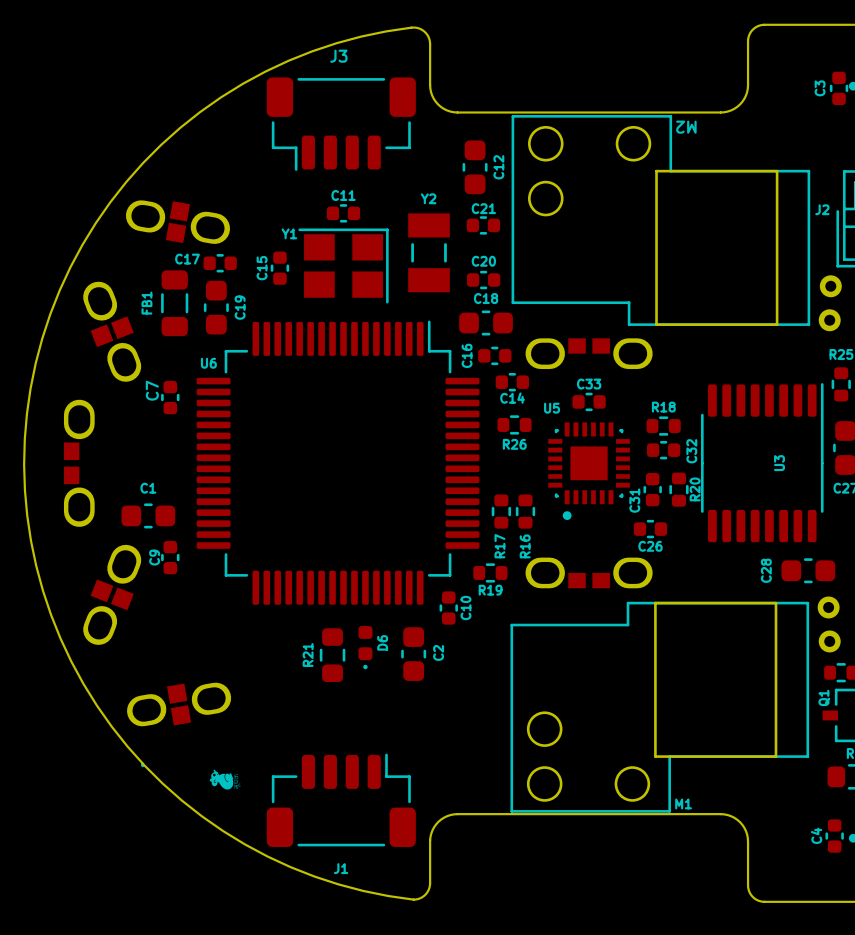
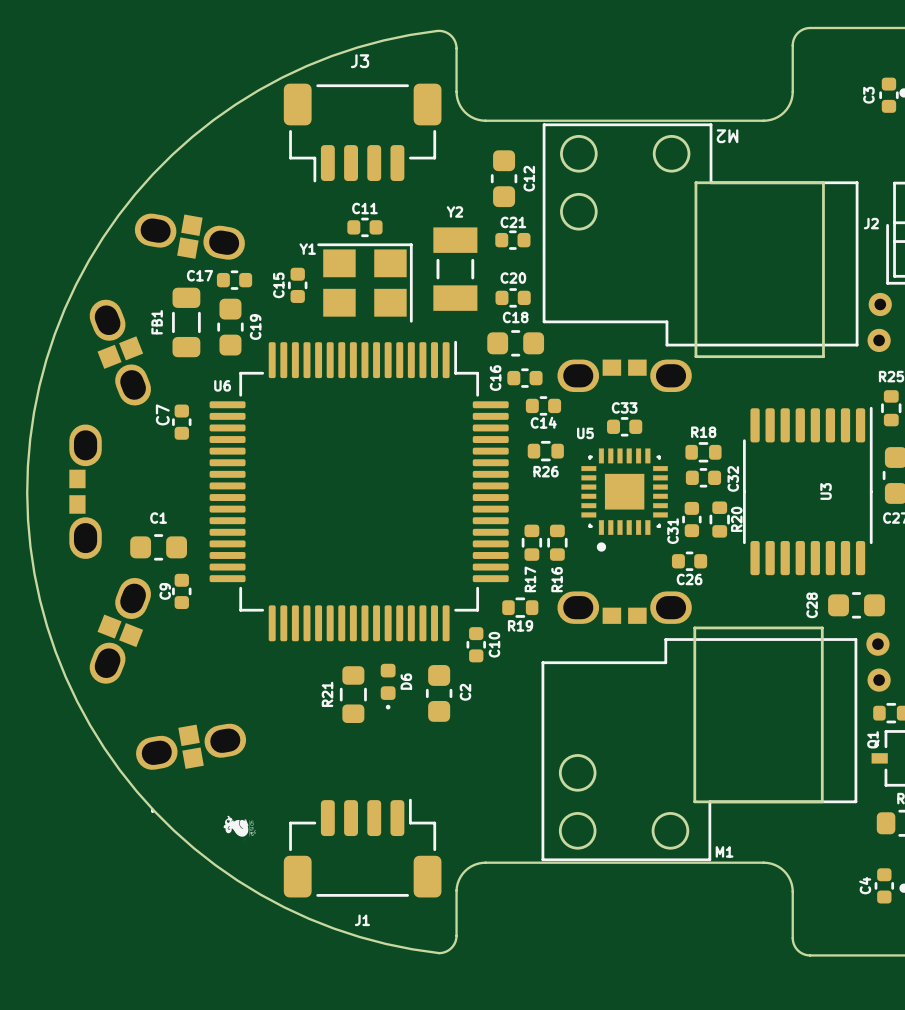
M2 footprint: [511, 115, 842, 332] -> [542, 123, 892, 359]
M1 footprint: [510, 596, 841, 813] -> [541, 626, 891, 862]

